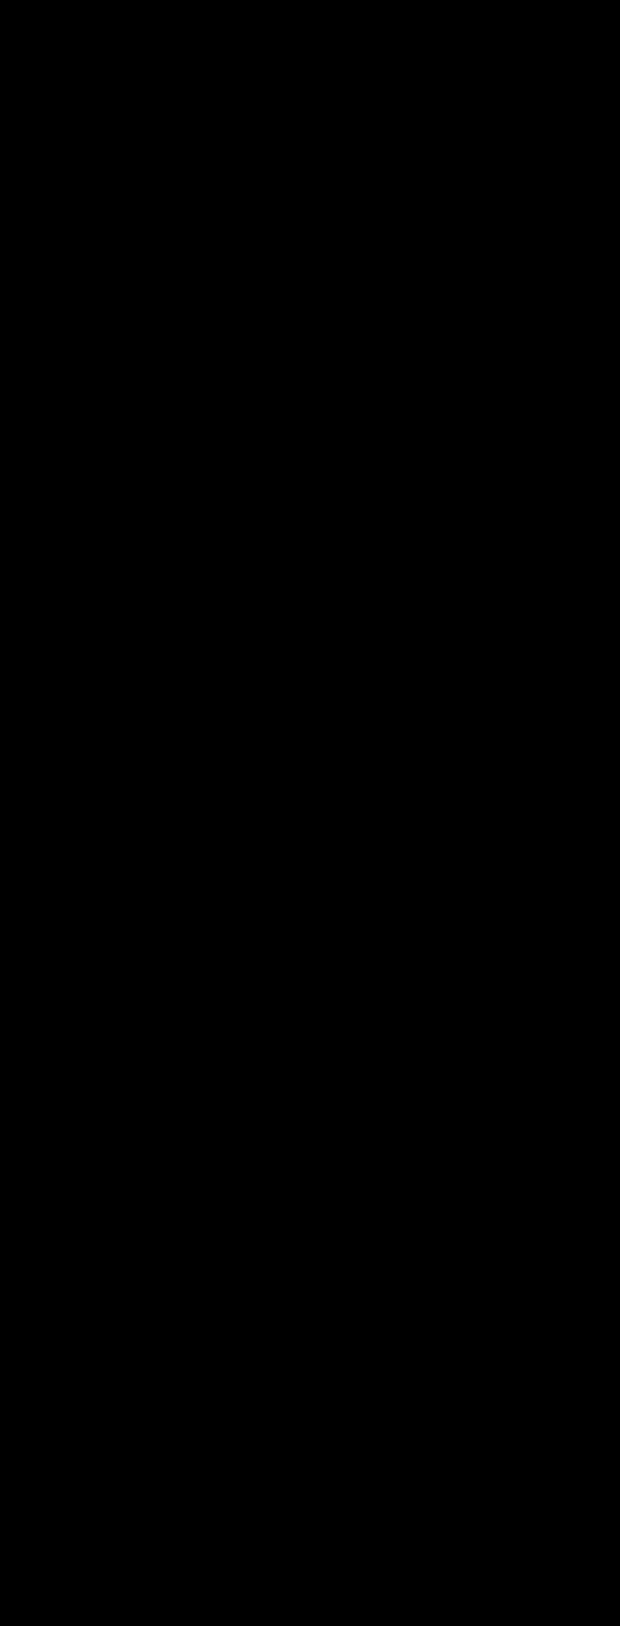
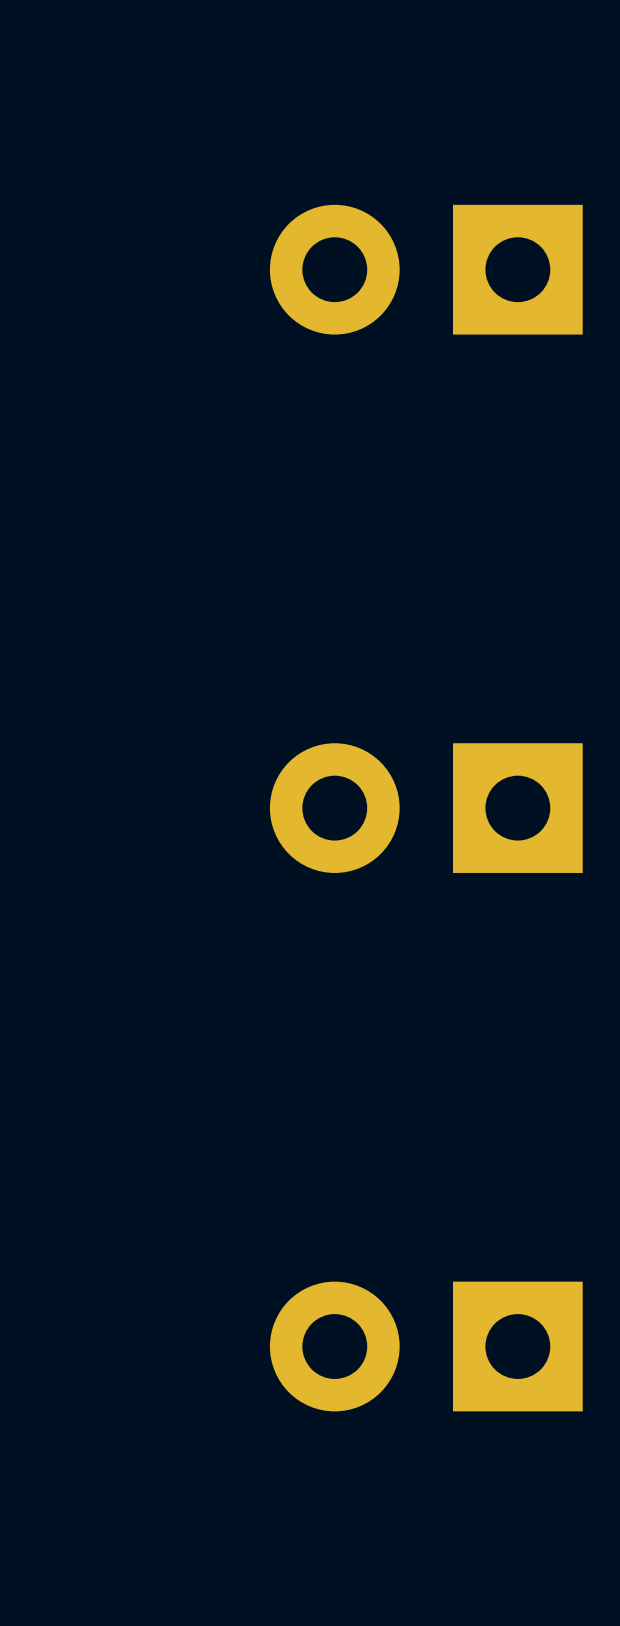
part: none -> (426, 269)
part: none -> (426, 808)
part: none -> (426, 1346)

